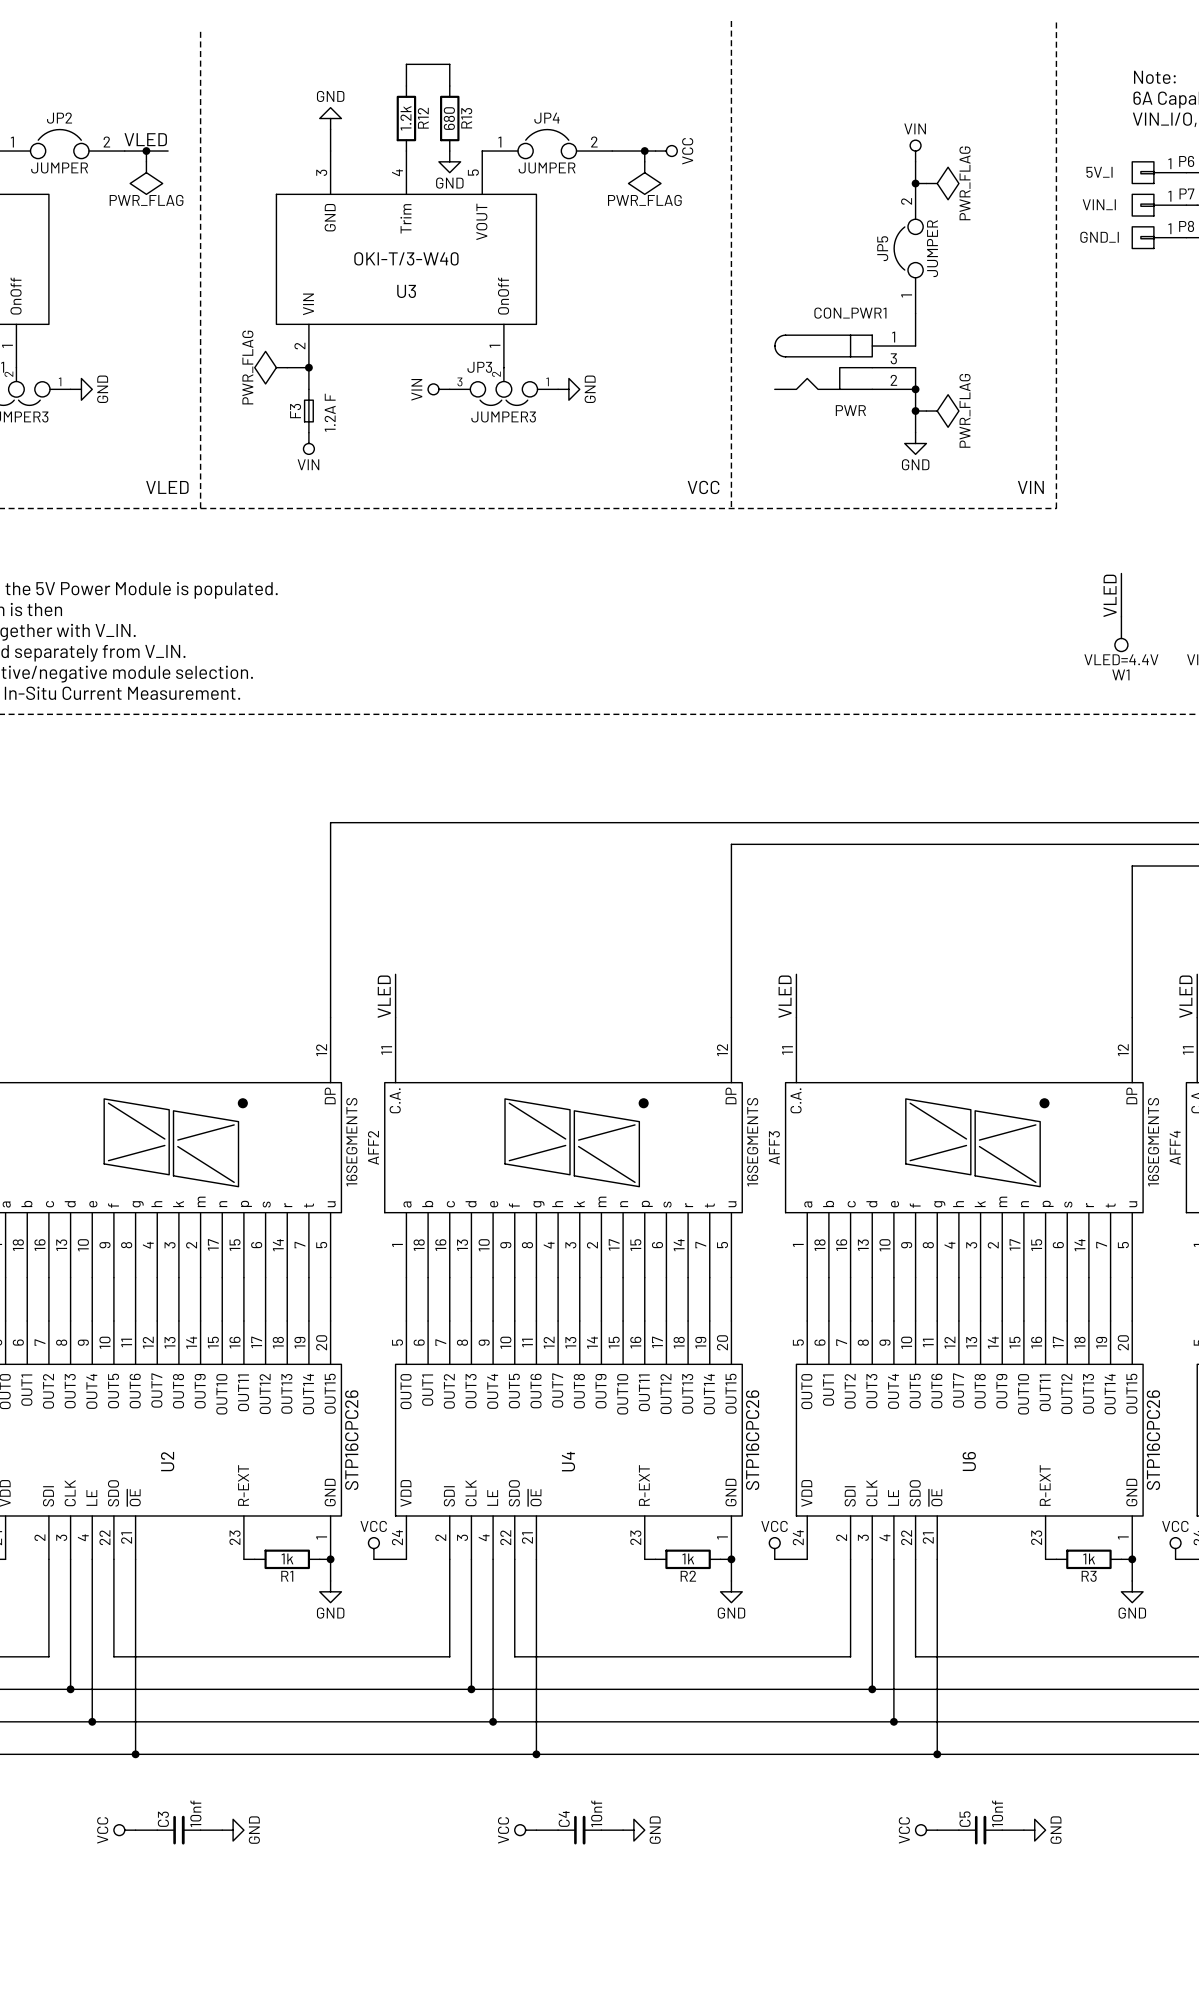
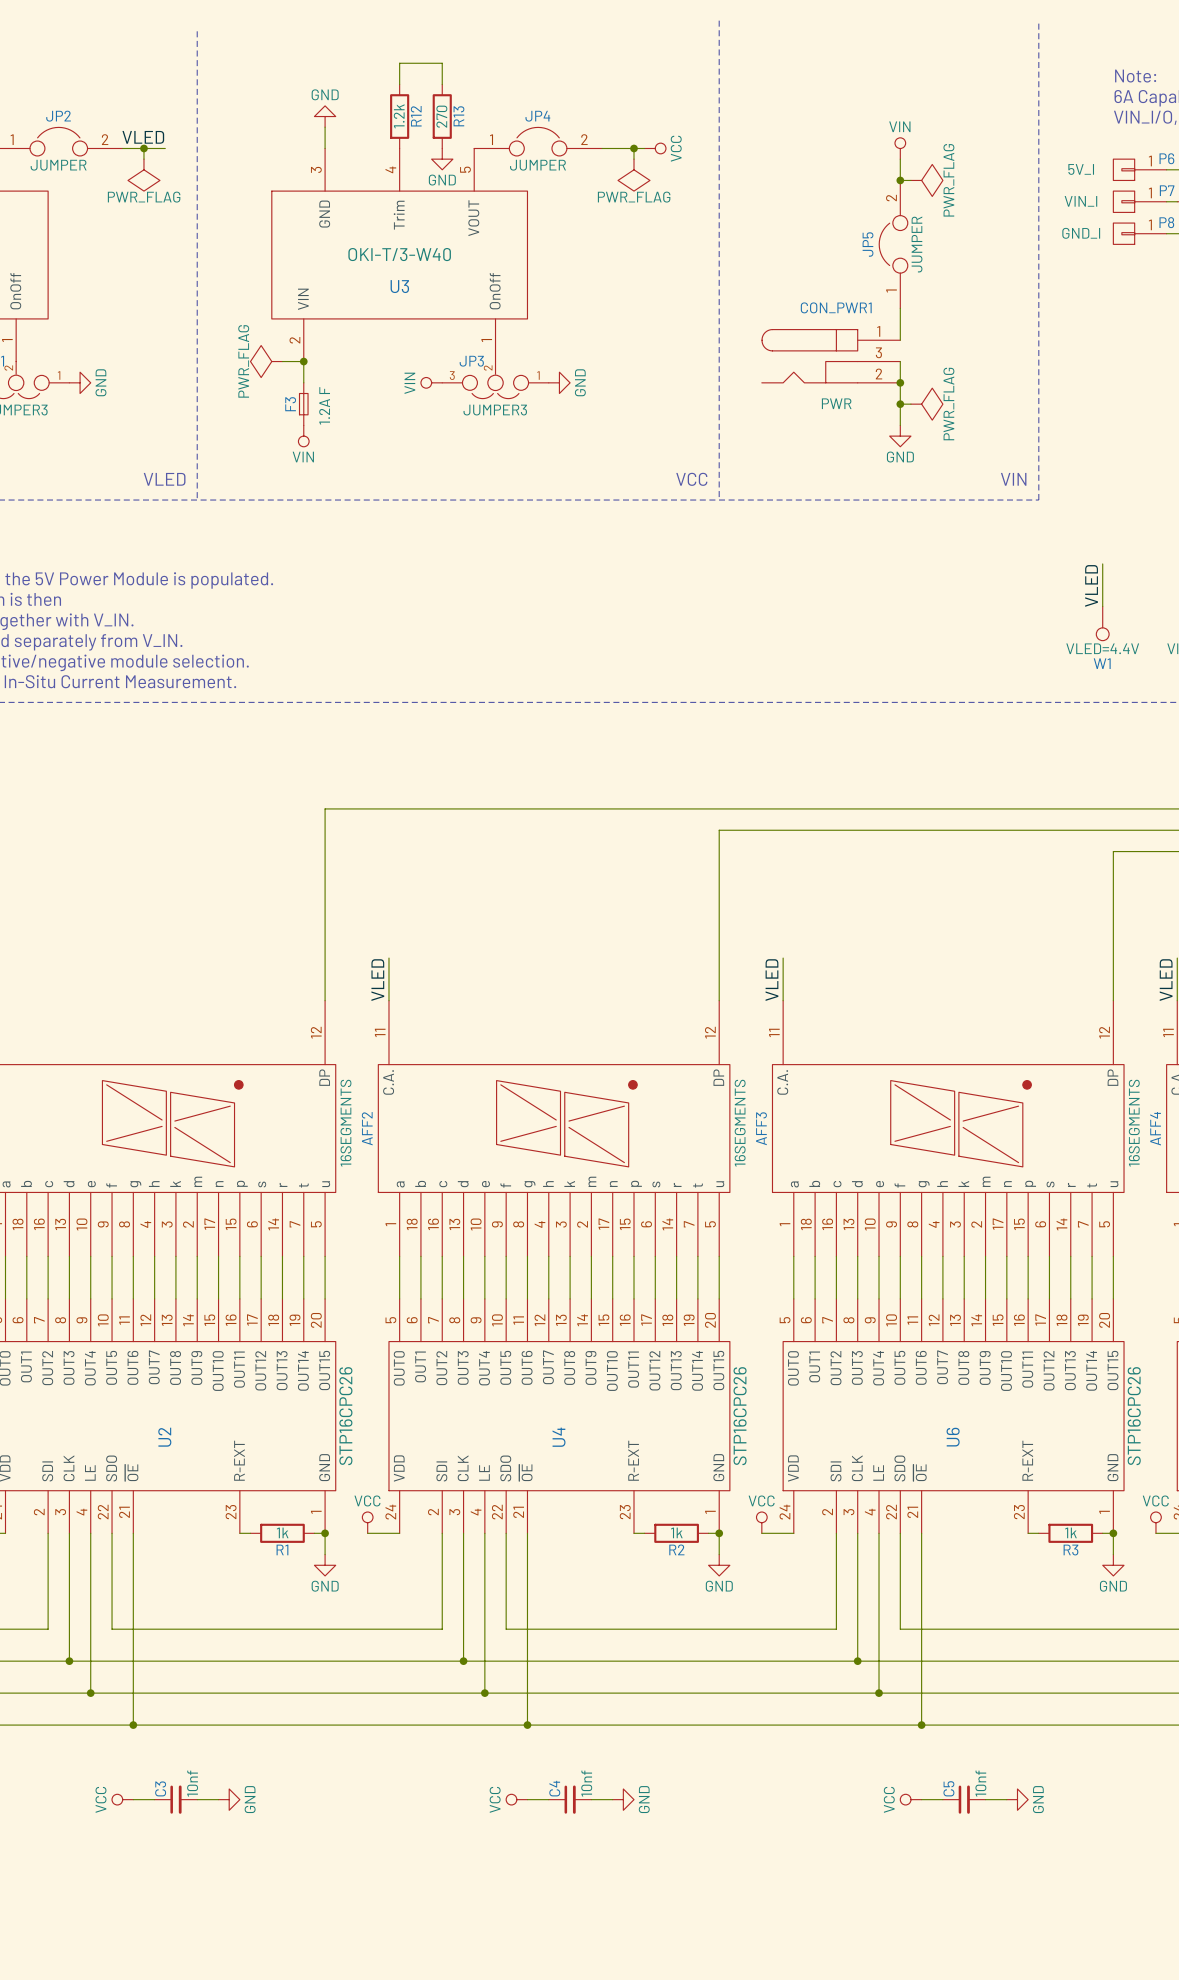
R13 value: 680 (449, 118) -> 270 (441, 116)

